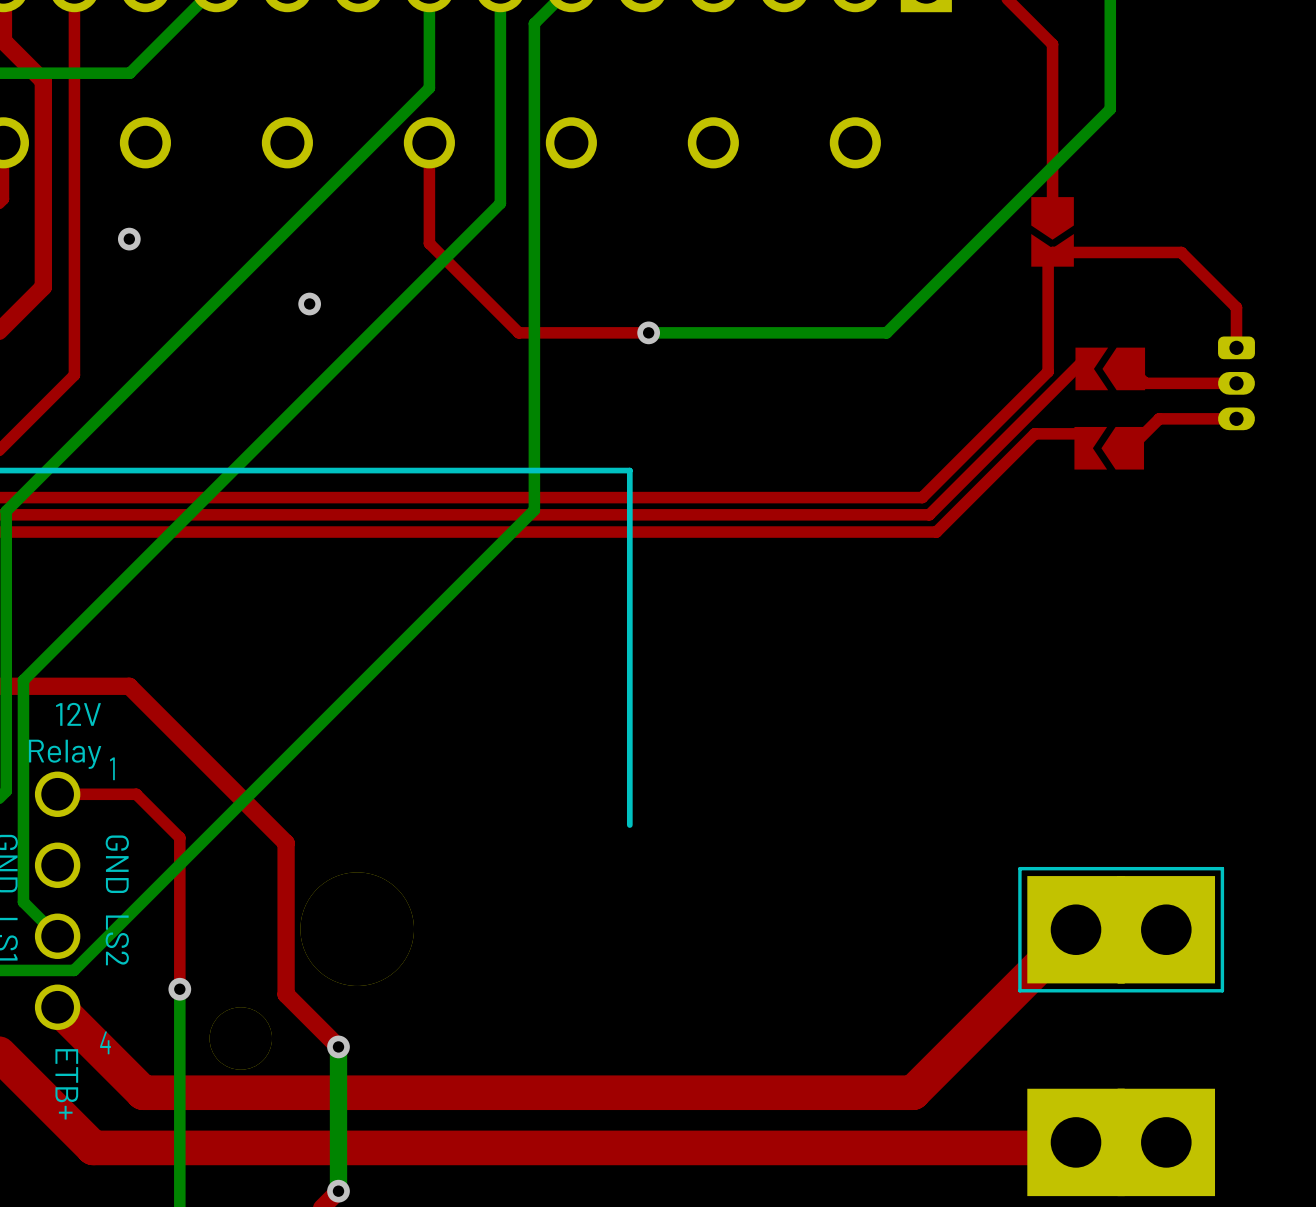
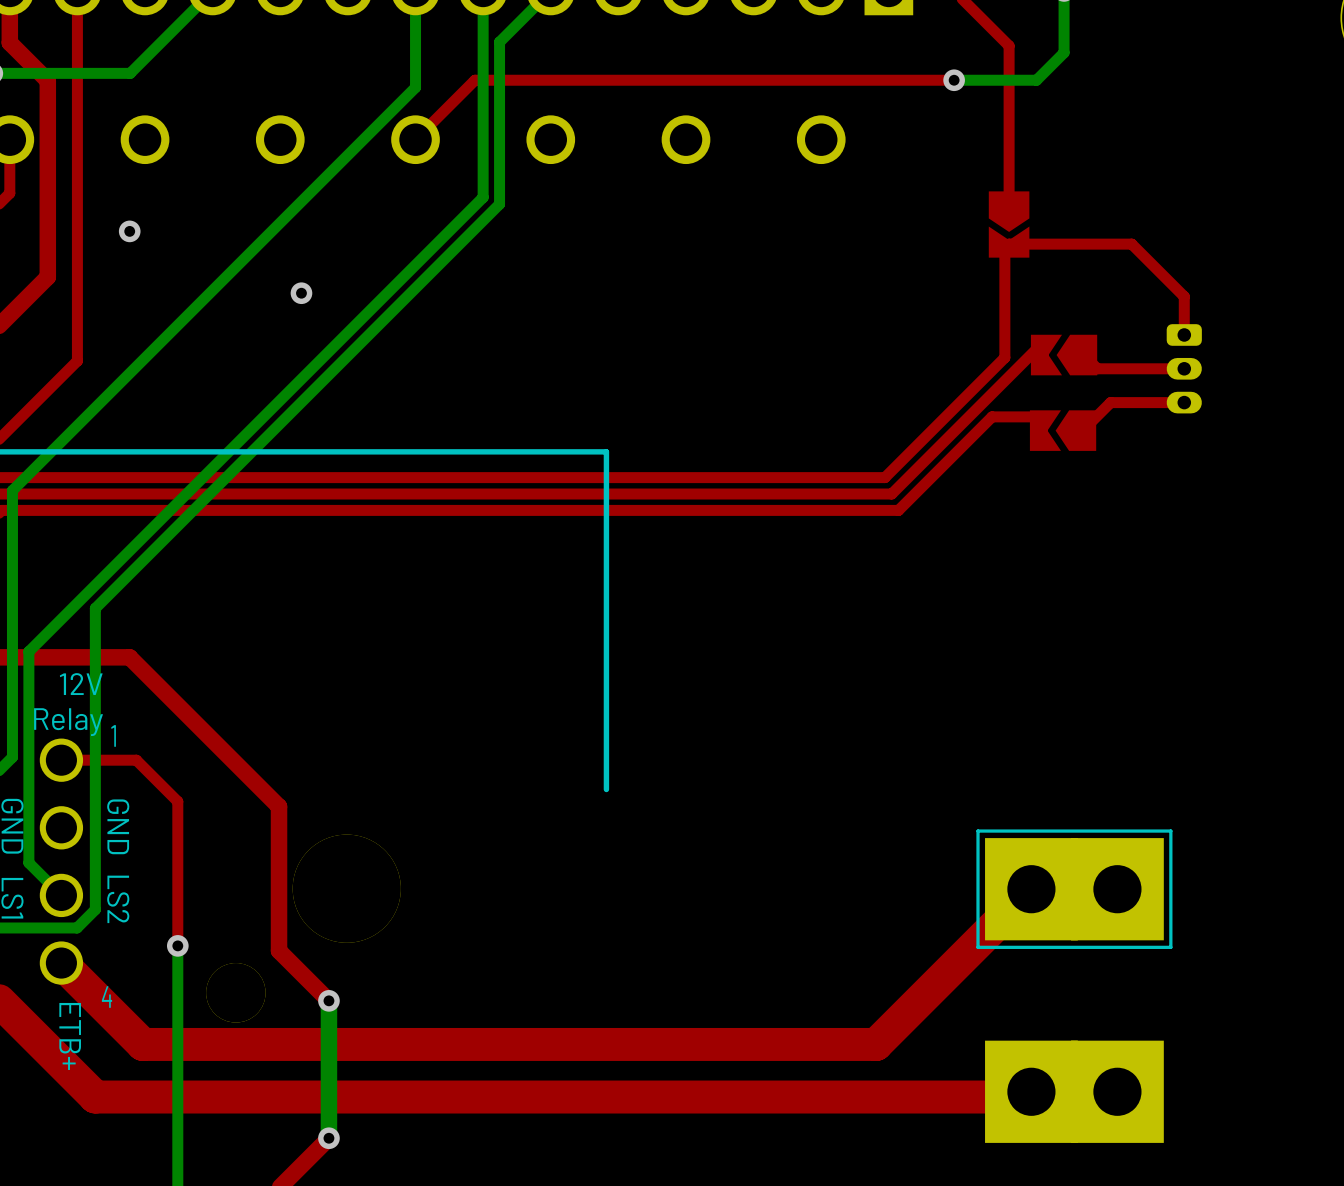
bottom track: (534, 23) (534, 510) (93, 951) -> (515, 26) (499, 42) (499, 204) (95, 608) (95, 909)
bottom track: (1110, 51) (1110, 109) (886, 332) (648, 332) -> (1064, 52) (1036, 80) (954, 80)
via: none -> (954, 80)
top track: (429, 142) (429, 243) (518, 332) (648, 332) -> (415, 139) (474, 80) (954, 80)
via: (648, 332) -> none

